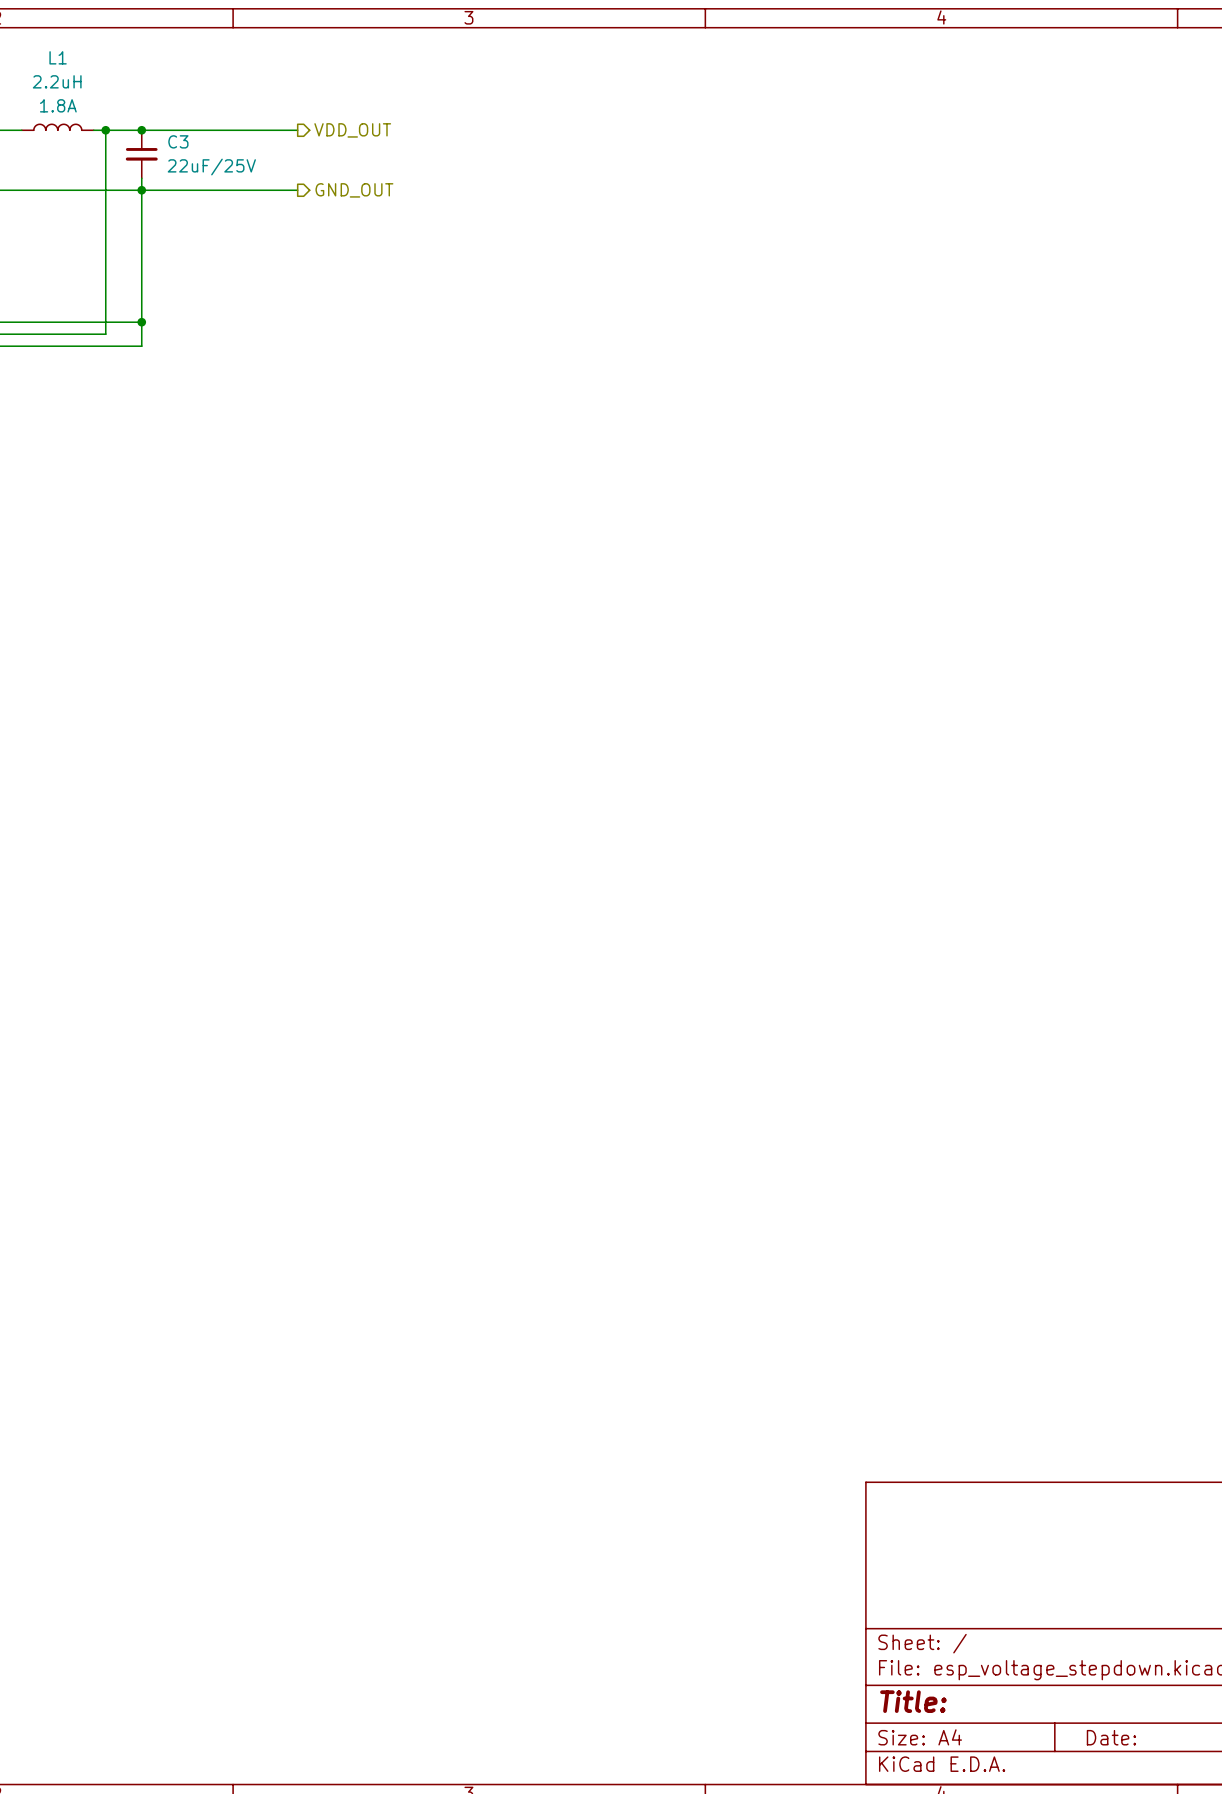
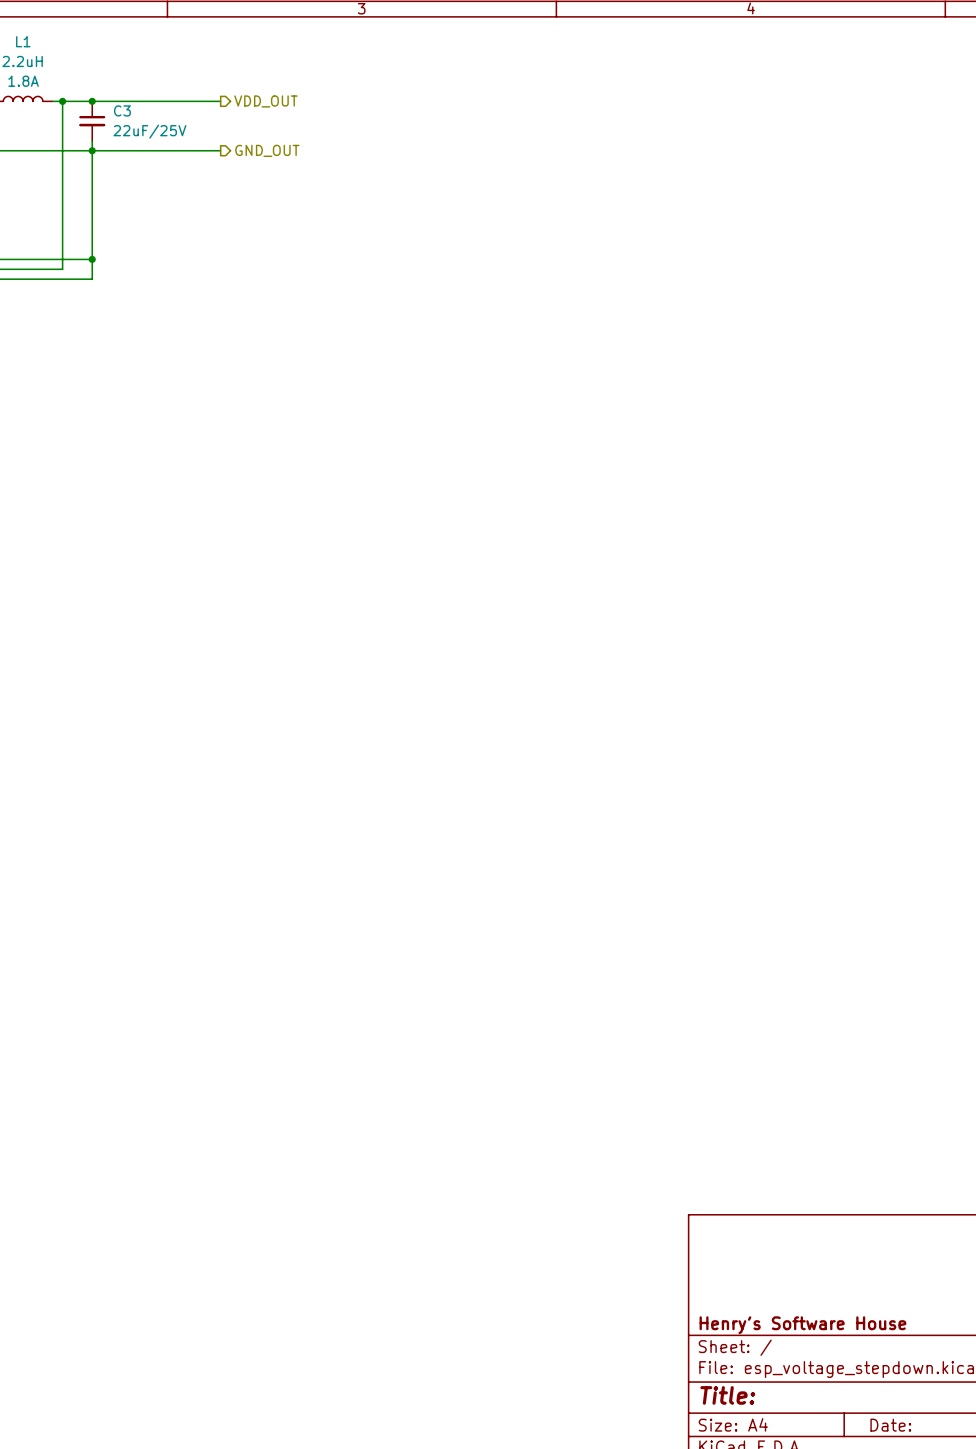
title block: none -> Henry's Software House (802, 1325)

